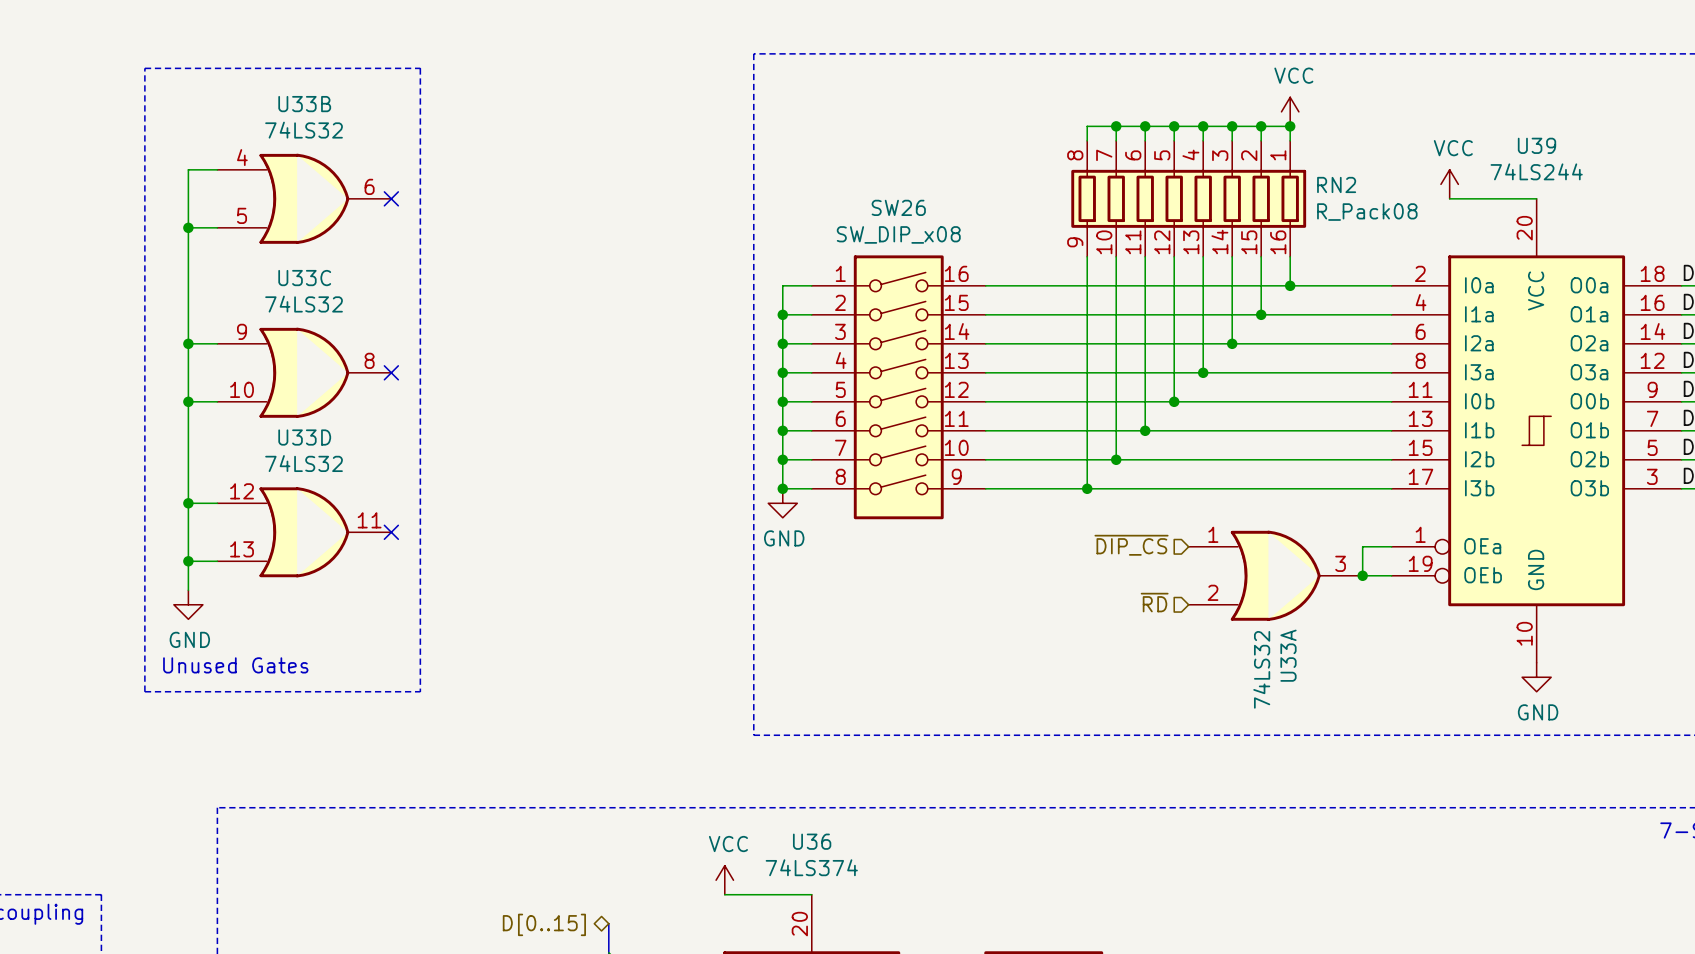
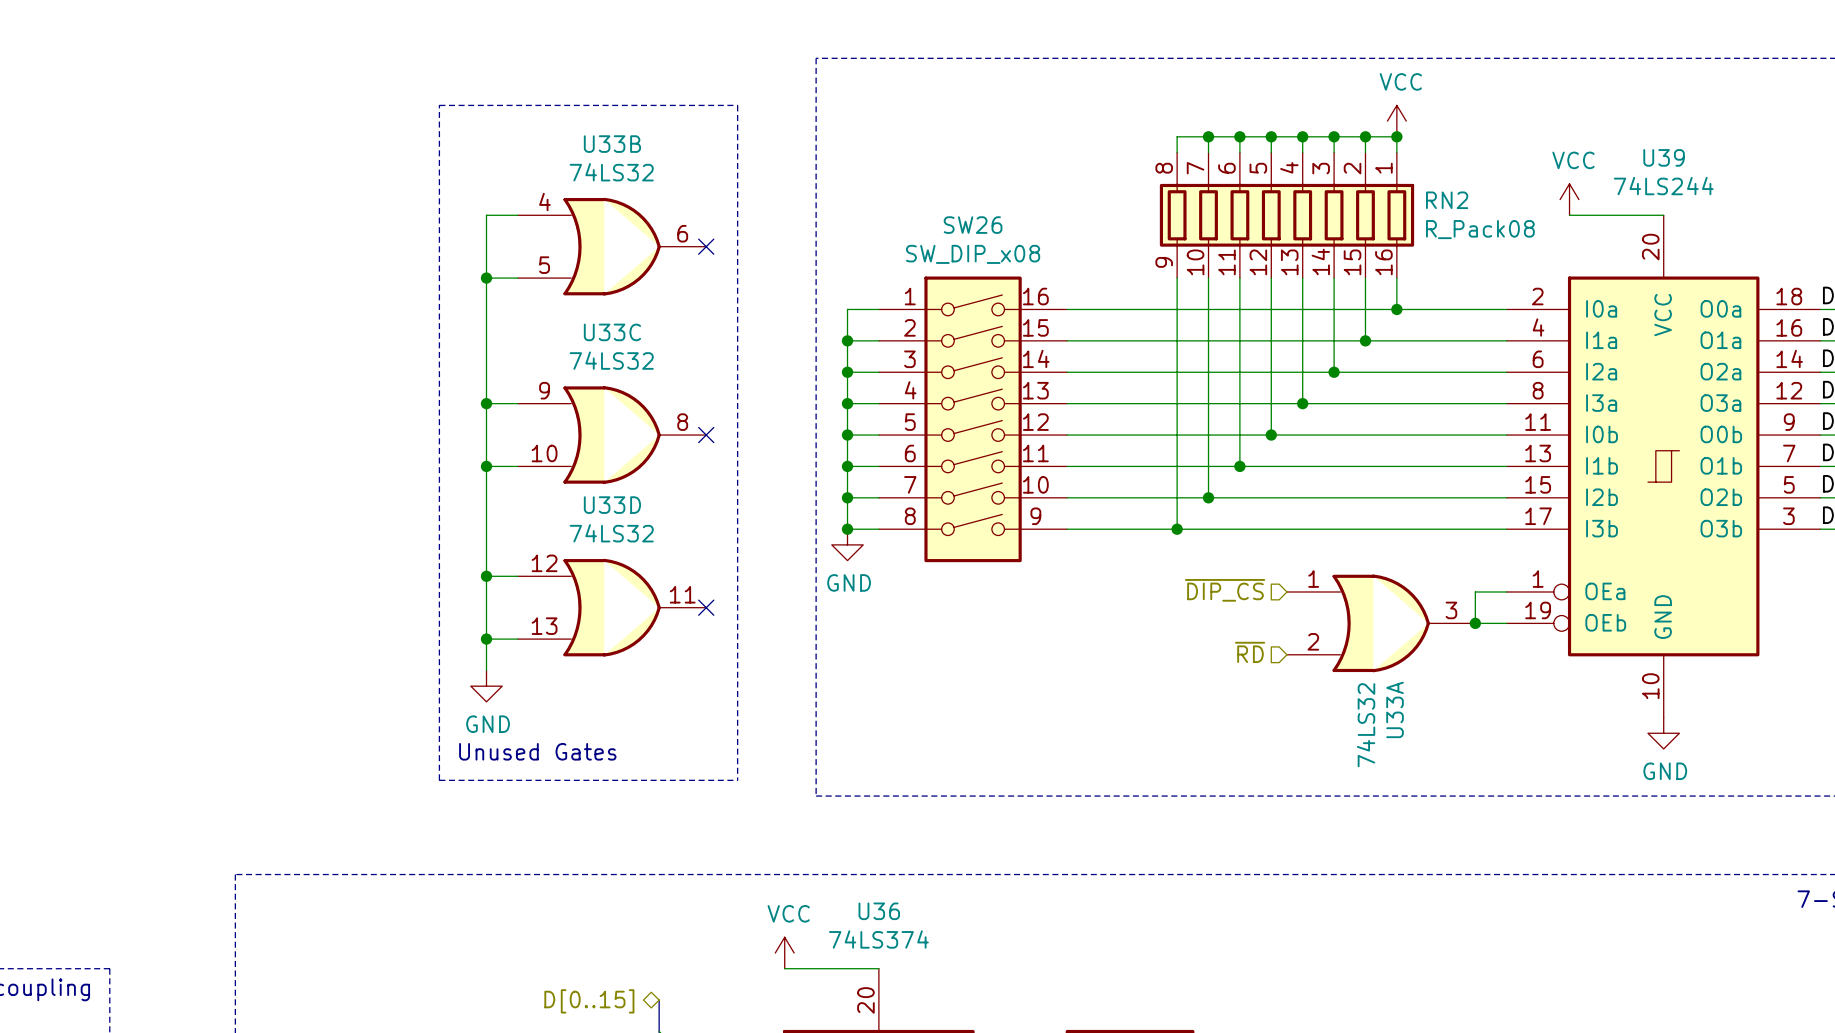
line: (144, 68) (144, 691) (420, 691) (420, 68) (144, 68) -> (439, 105) (439, 780) (737, 780) (737, 105) (439, 105)
wire: (217, 169) (188, 169) (188, 590) -> (517, 215) (486, 215) (486, 670)
U33B position: (304, 198) -> (612, 246)
no-connect mark: (391, 198) -> none
wire: (188, 227) (217, 227) -> (486, 278) (517, 278)
junction: (188, 227) -> none
no-connect mark: none -> (706, 246)
junction: none -> (486, 278)
wire: (188, 343) (217, 343) -> (486, 403) (517, 403)
junction: (188, 343) -> none
U33C position: (304, 372) -> (612, 435)
no-connect mark: (391, 372) -> none
junction: none -> (486, 403)
wire: (188, 401) (217, 401) -> (486, 466) (517, 466)
junction: (188, 401) -> none
no-connect mark: none -> (706, 435)
junction: none -> (486, 466)
wire: (188, 503) (217, 503) -> (486, 576) (517, 576)
junction: (188, 503) -> none
U33D position: (304, 532) -> (612, 607)
no-connect mark: (391, 532) -> none
junction: none -> (486, 576)
wire: (188, 561) (217, 561) -> (486, 639) (517, 639)
junction: (188, 561) -> none
no-connect mark: none -> (706, 607)
junction: none -> (486, 639)
power symbol position: GND (188, 604) -> GND (486, 686)
text position: Unused Gates (235, 665) -> Unused Gates (537, 751)

